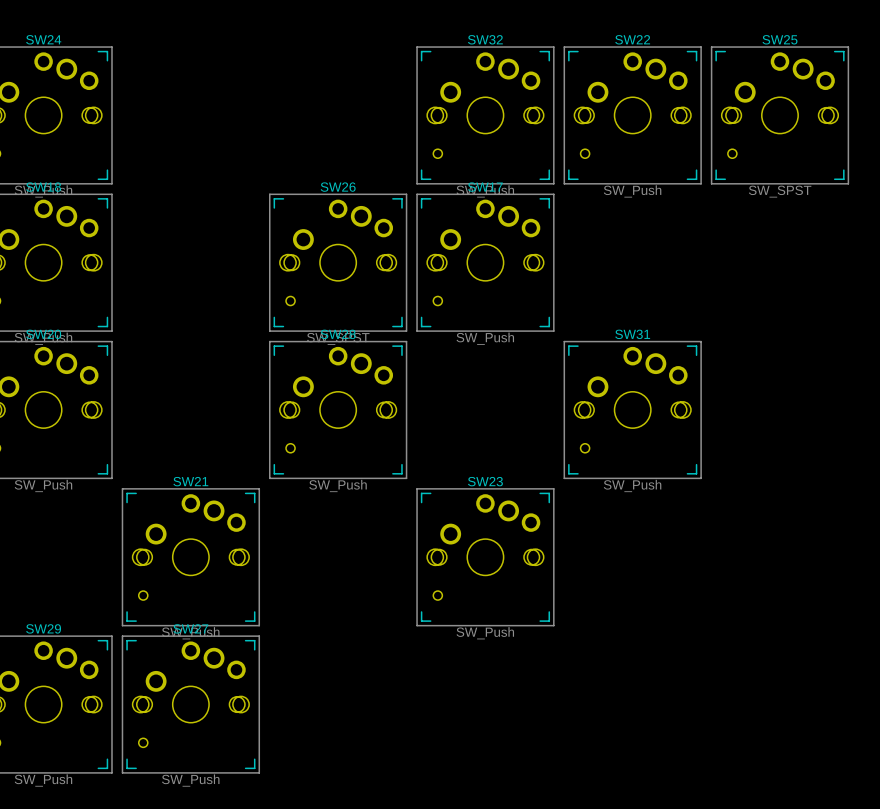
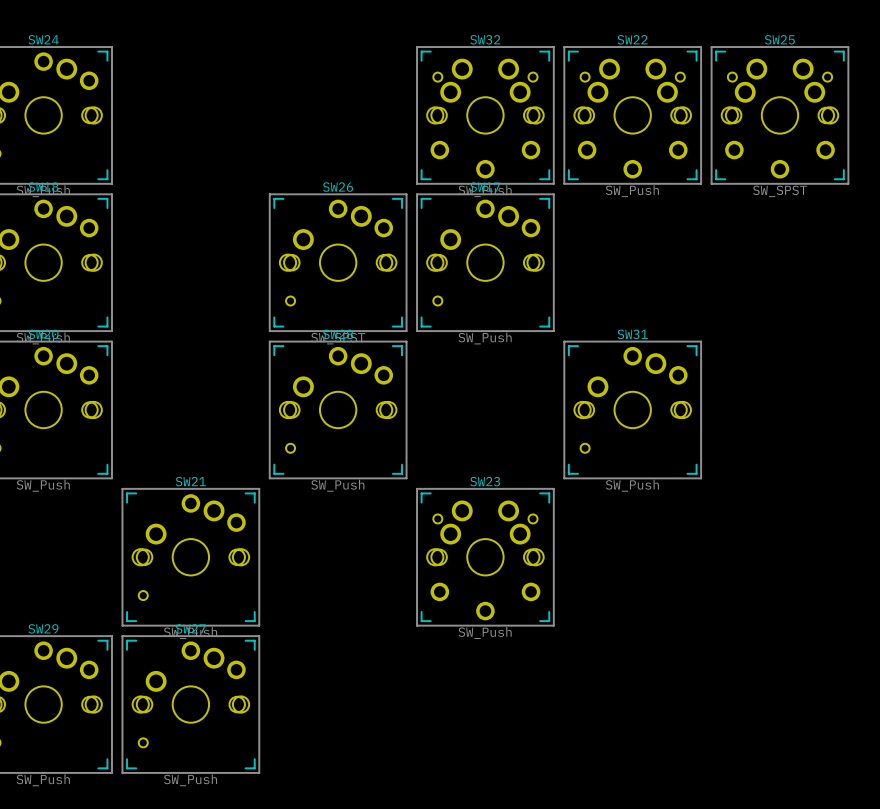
SW32 footprint: [416, 46, 555, 185] -> [416, 46, 555, 185]
SW22 footprint: [563, 46, 702, 185] -> [563, 46, 702, 185]
SW25 footprint: [710, 46, 850, 185] -> [710, 46, 850, 185]
SW23 footprint: [416, 488, 555, 627] -> [416, 488, 555, 627]

